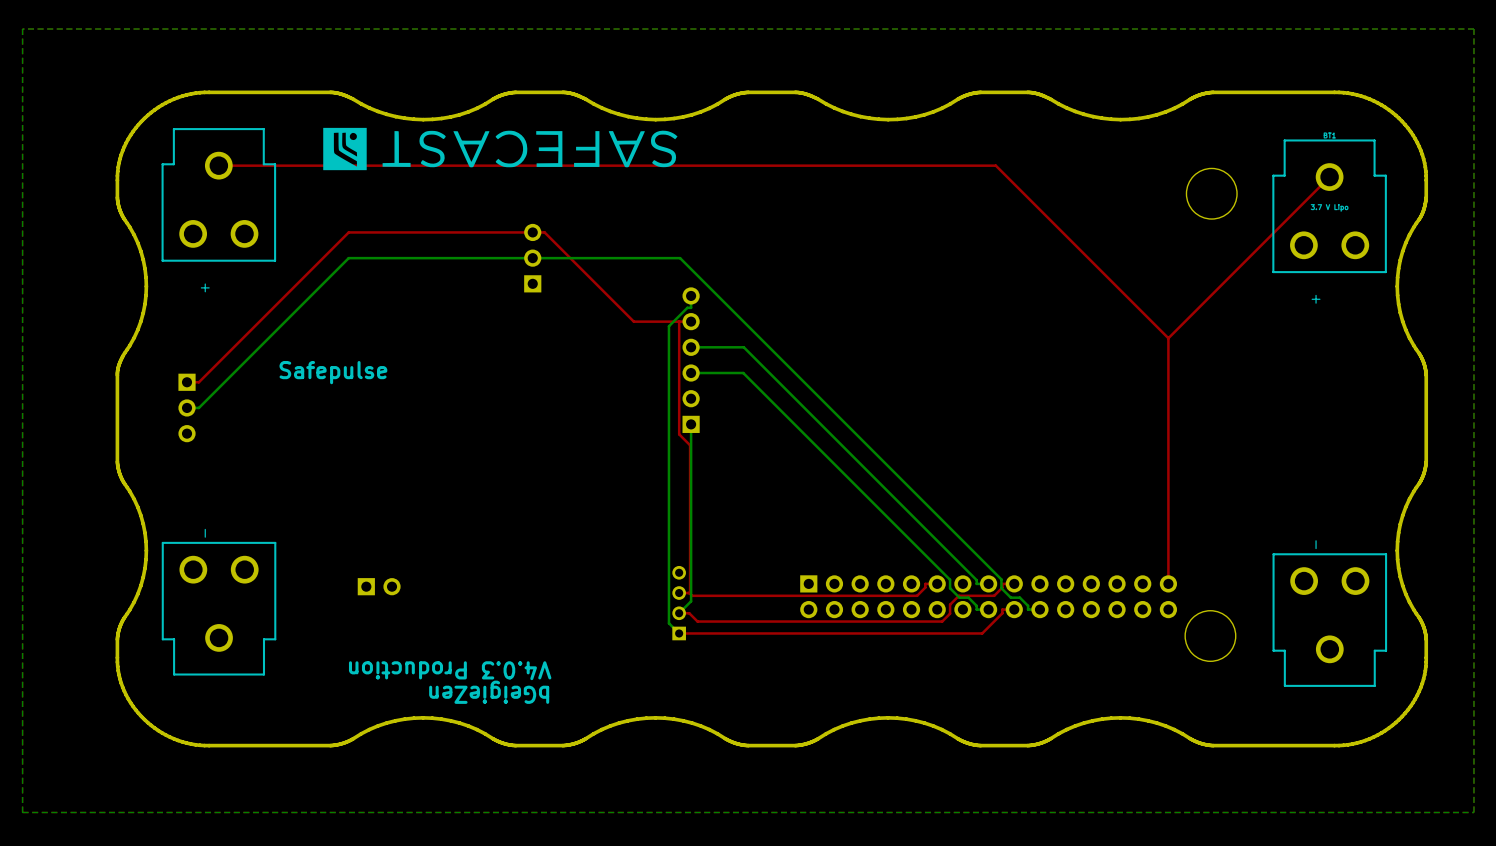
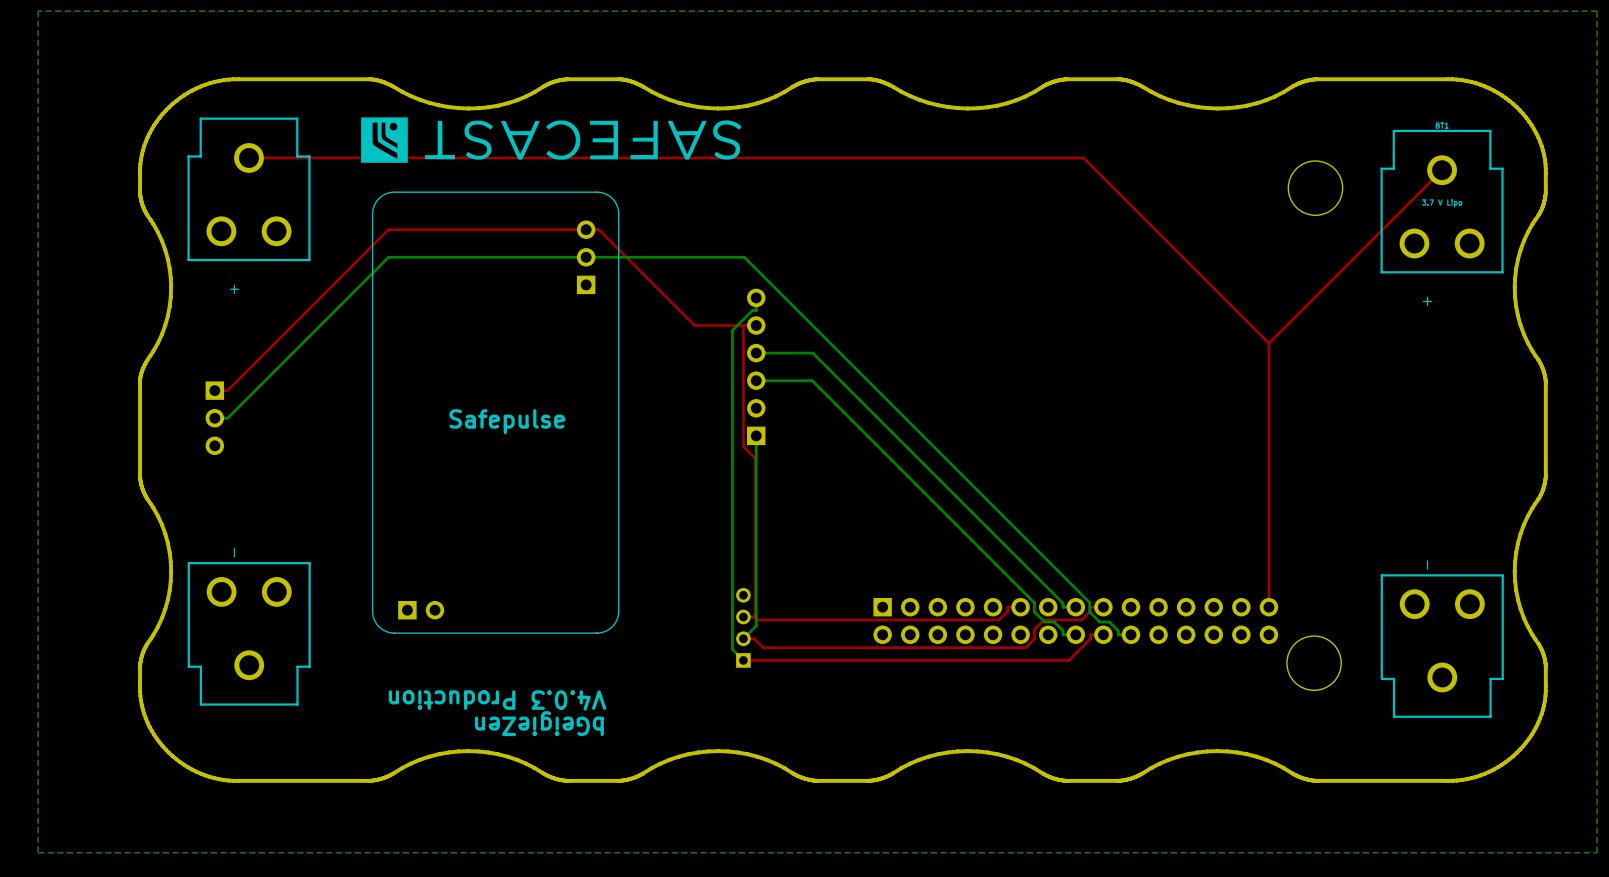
line: none -> (596, 192) (394, 192) (382, 195) (374, 204) (372, 213) (372, 611) (375, 622) (384, 630) (394, 633) (596, 633) (608, 629) (616, 620) (618, 611) (618, 213) (616, 204) (612, 198) (606, 194) (596, 192)
text position: Safepulse (333, 372) -> Safepulse (507, 421)

